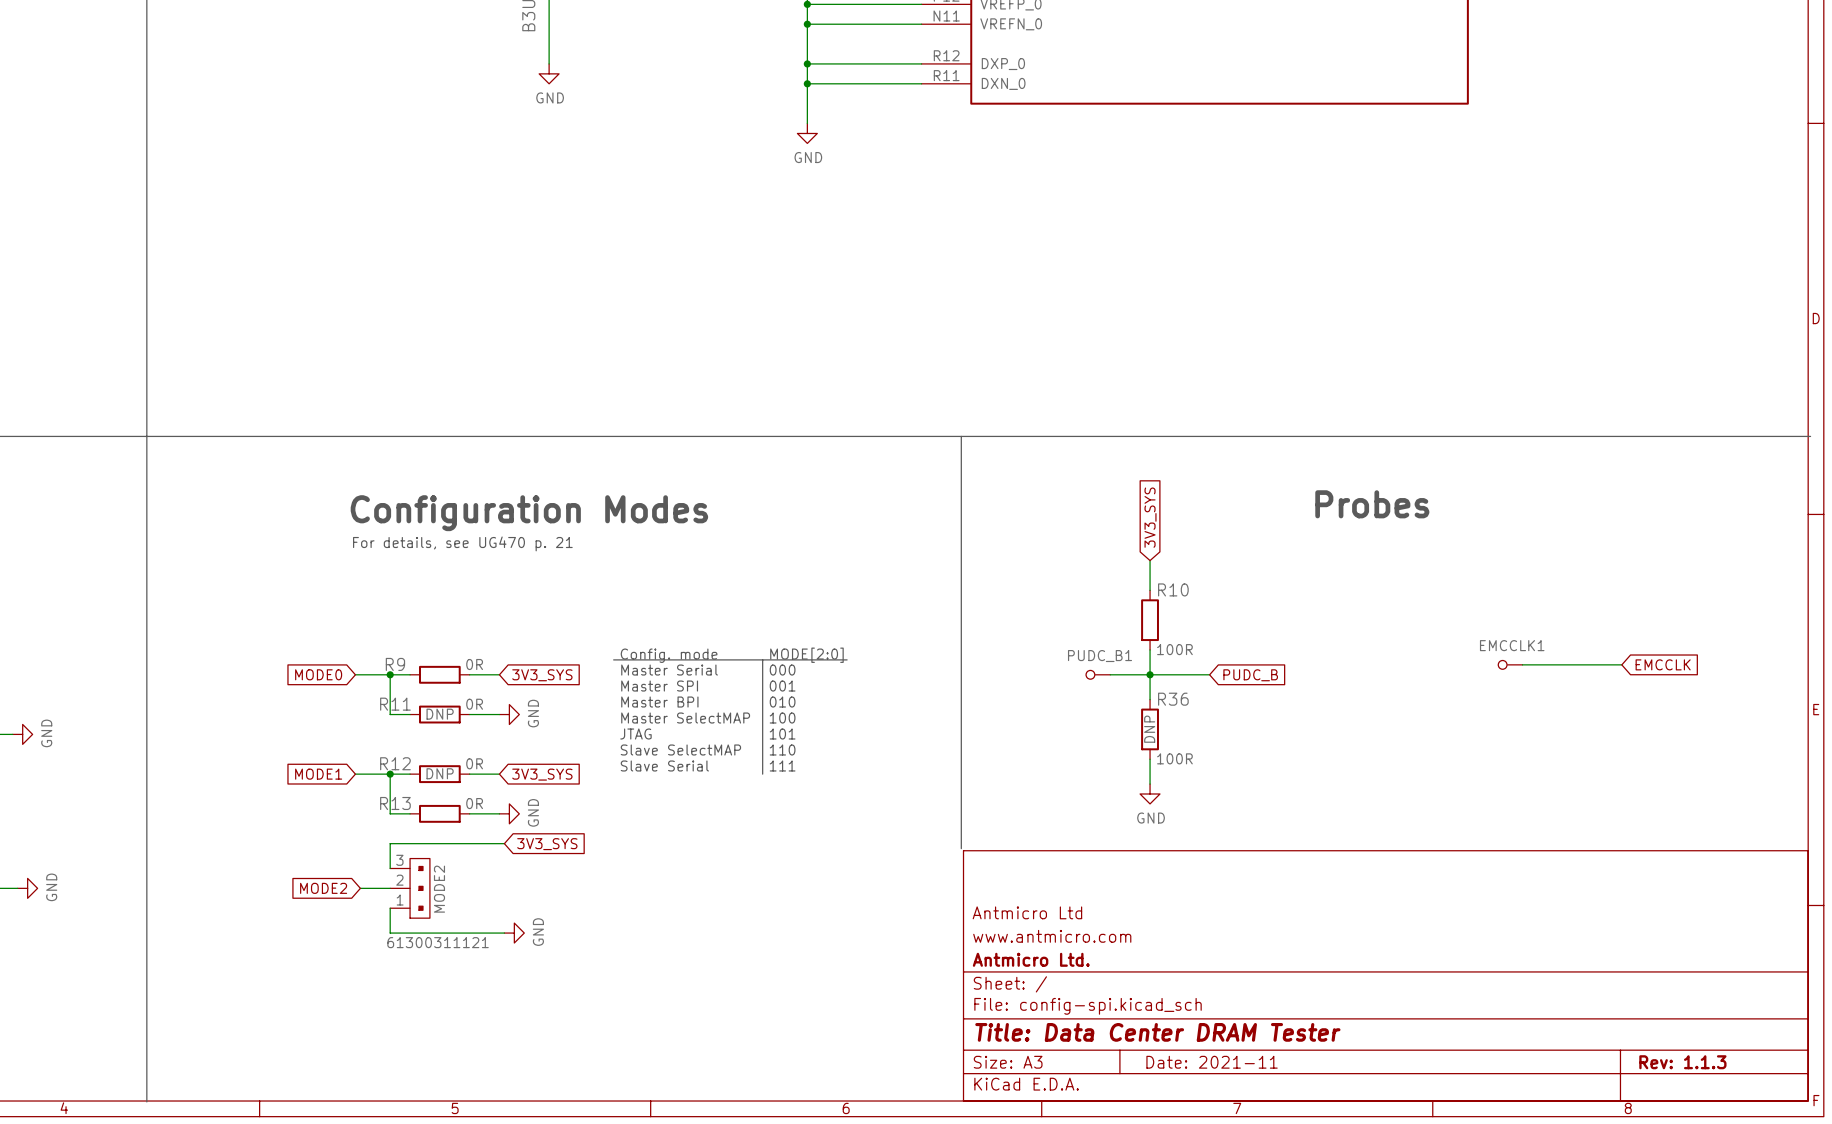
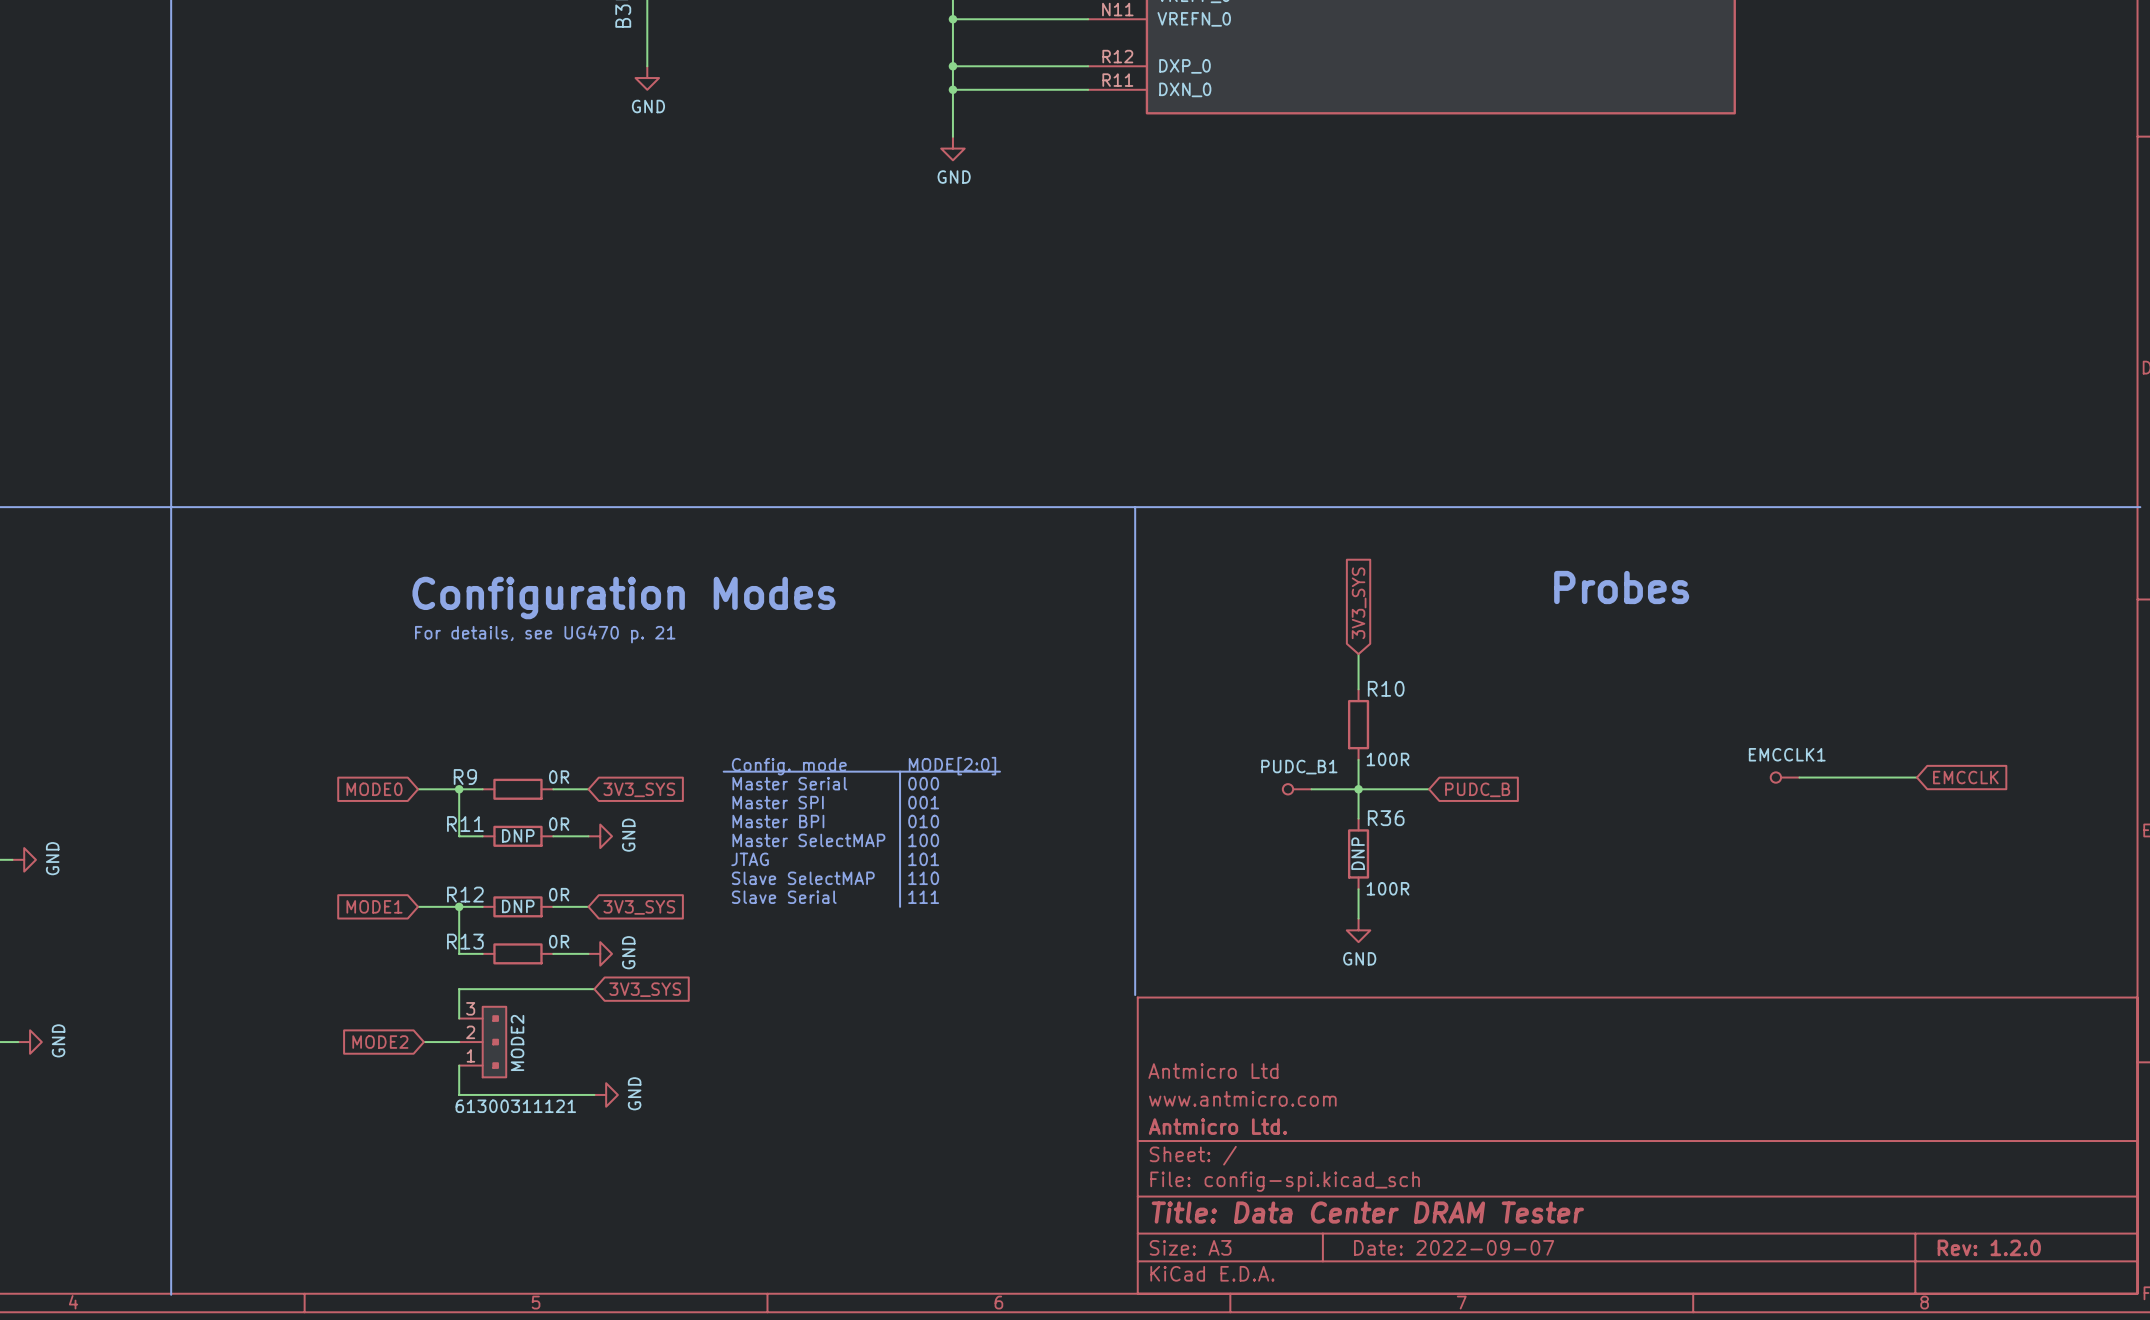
title block: Date: 2021-11 (1212, 1062) -> Date: 2022-09-07 (1454, 1247)
title block: Rev: 1.1.3 (1682, 1062) -> Rev: 1.2.0 (1989, 1247)

